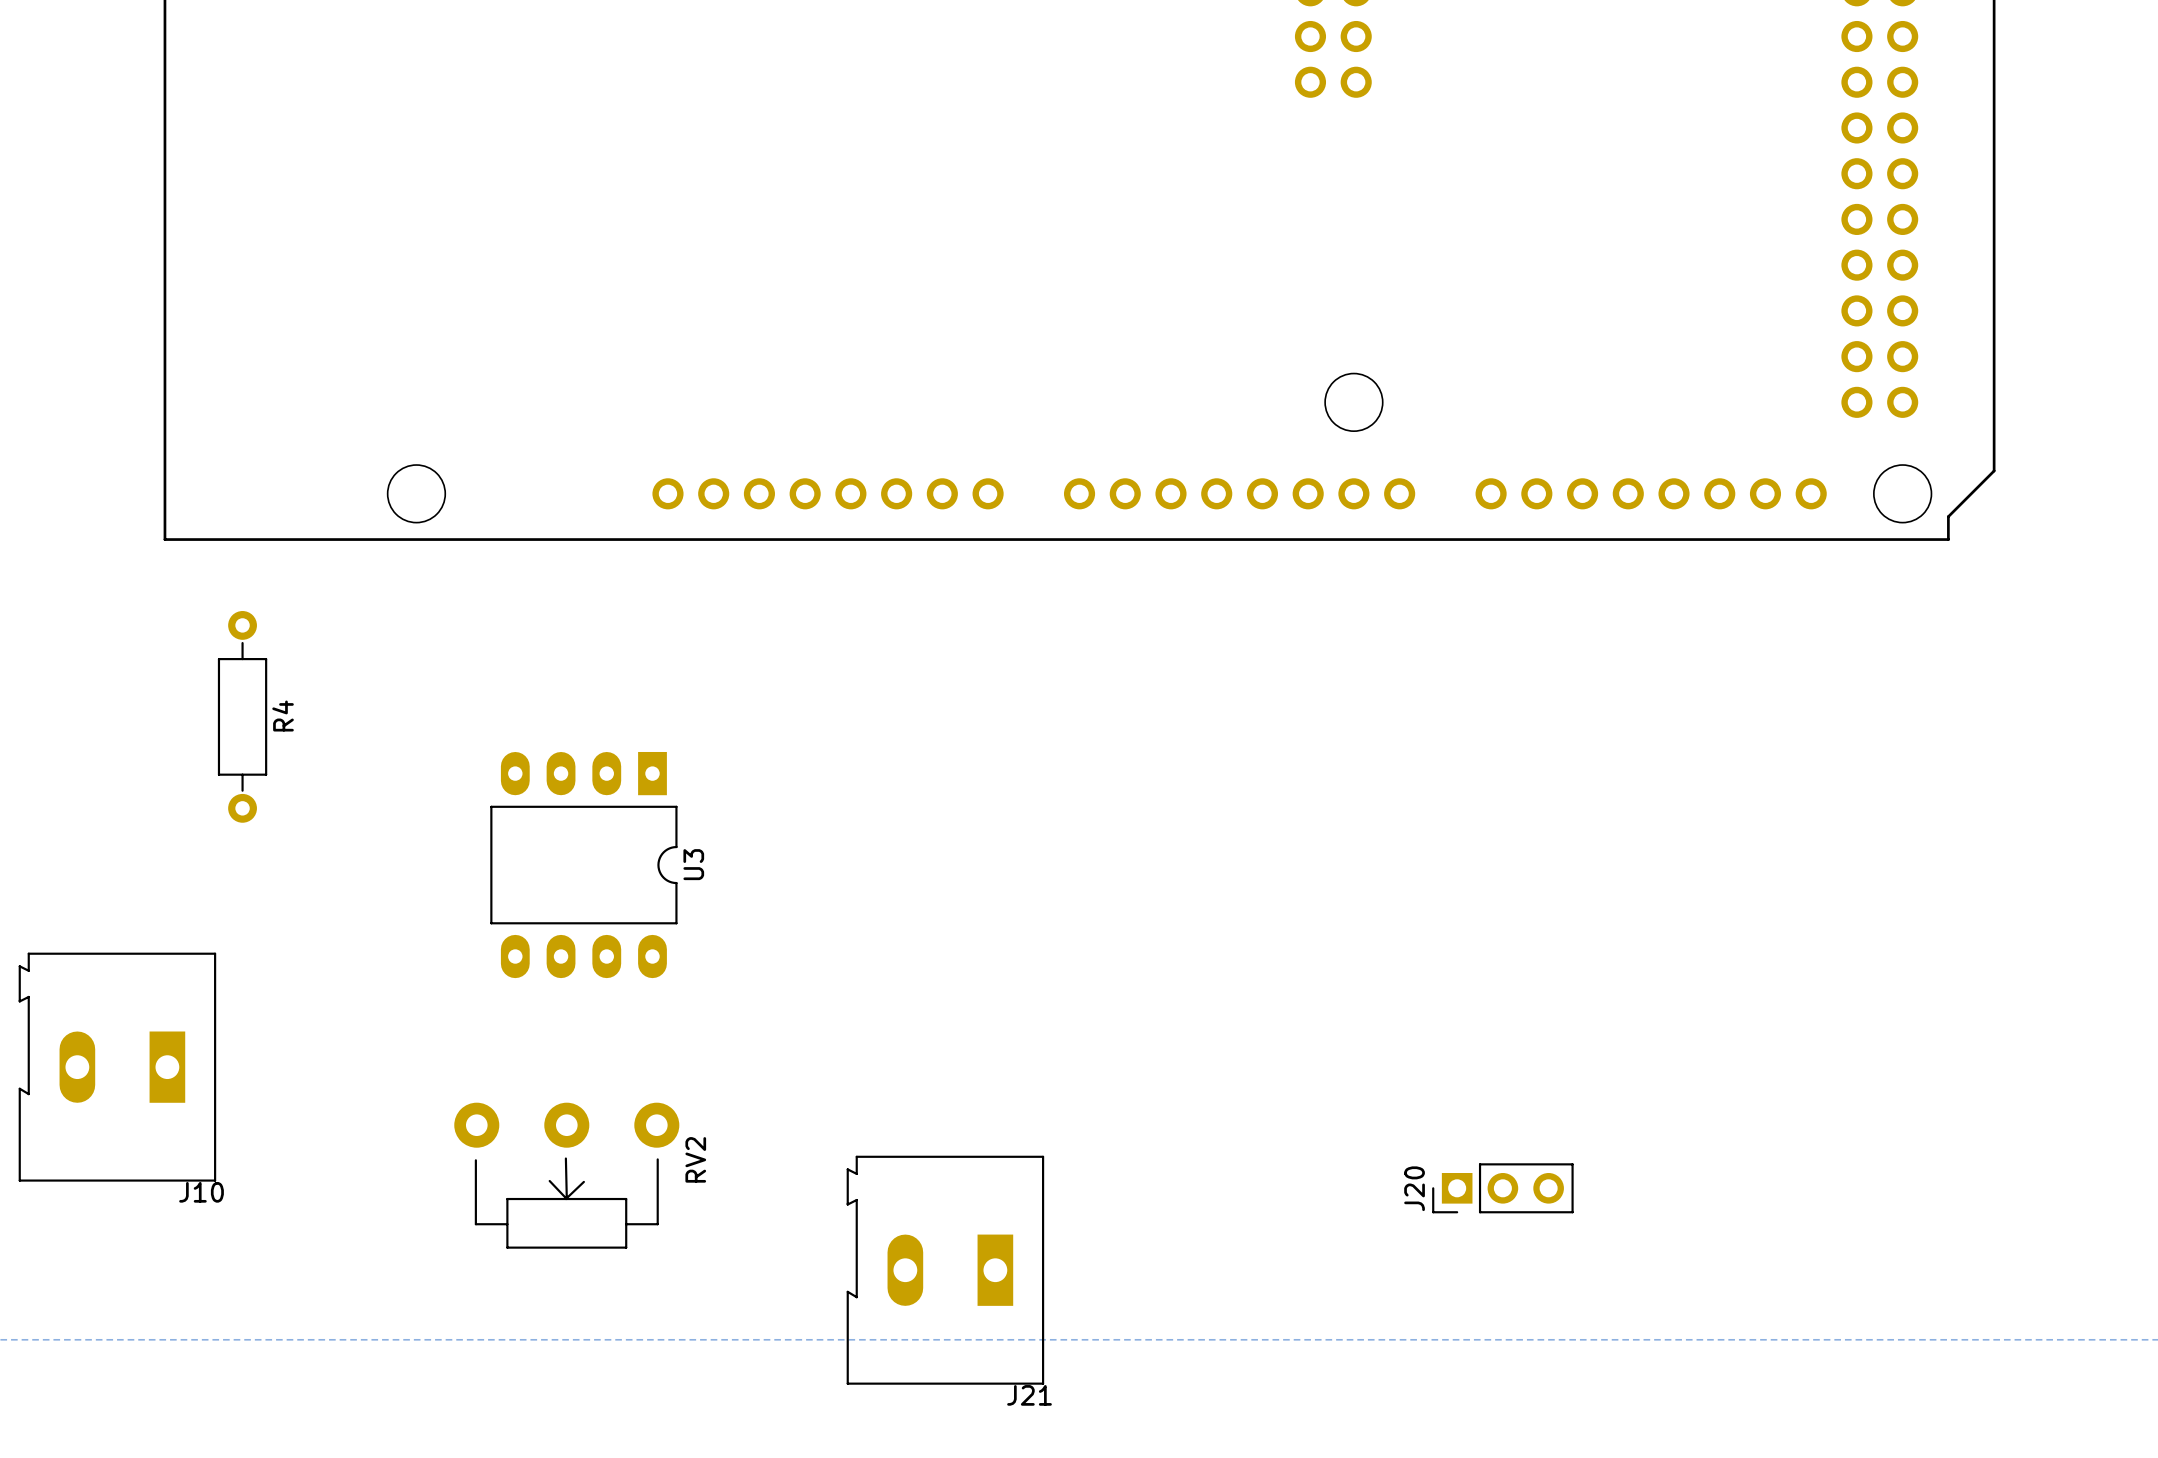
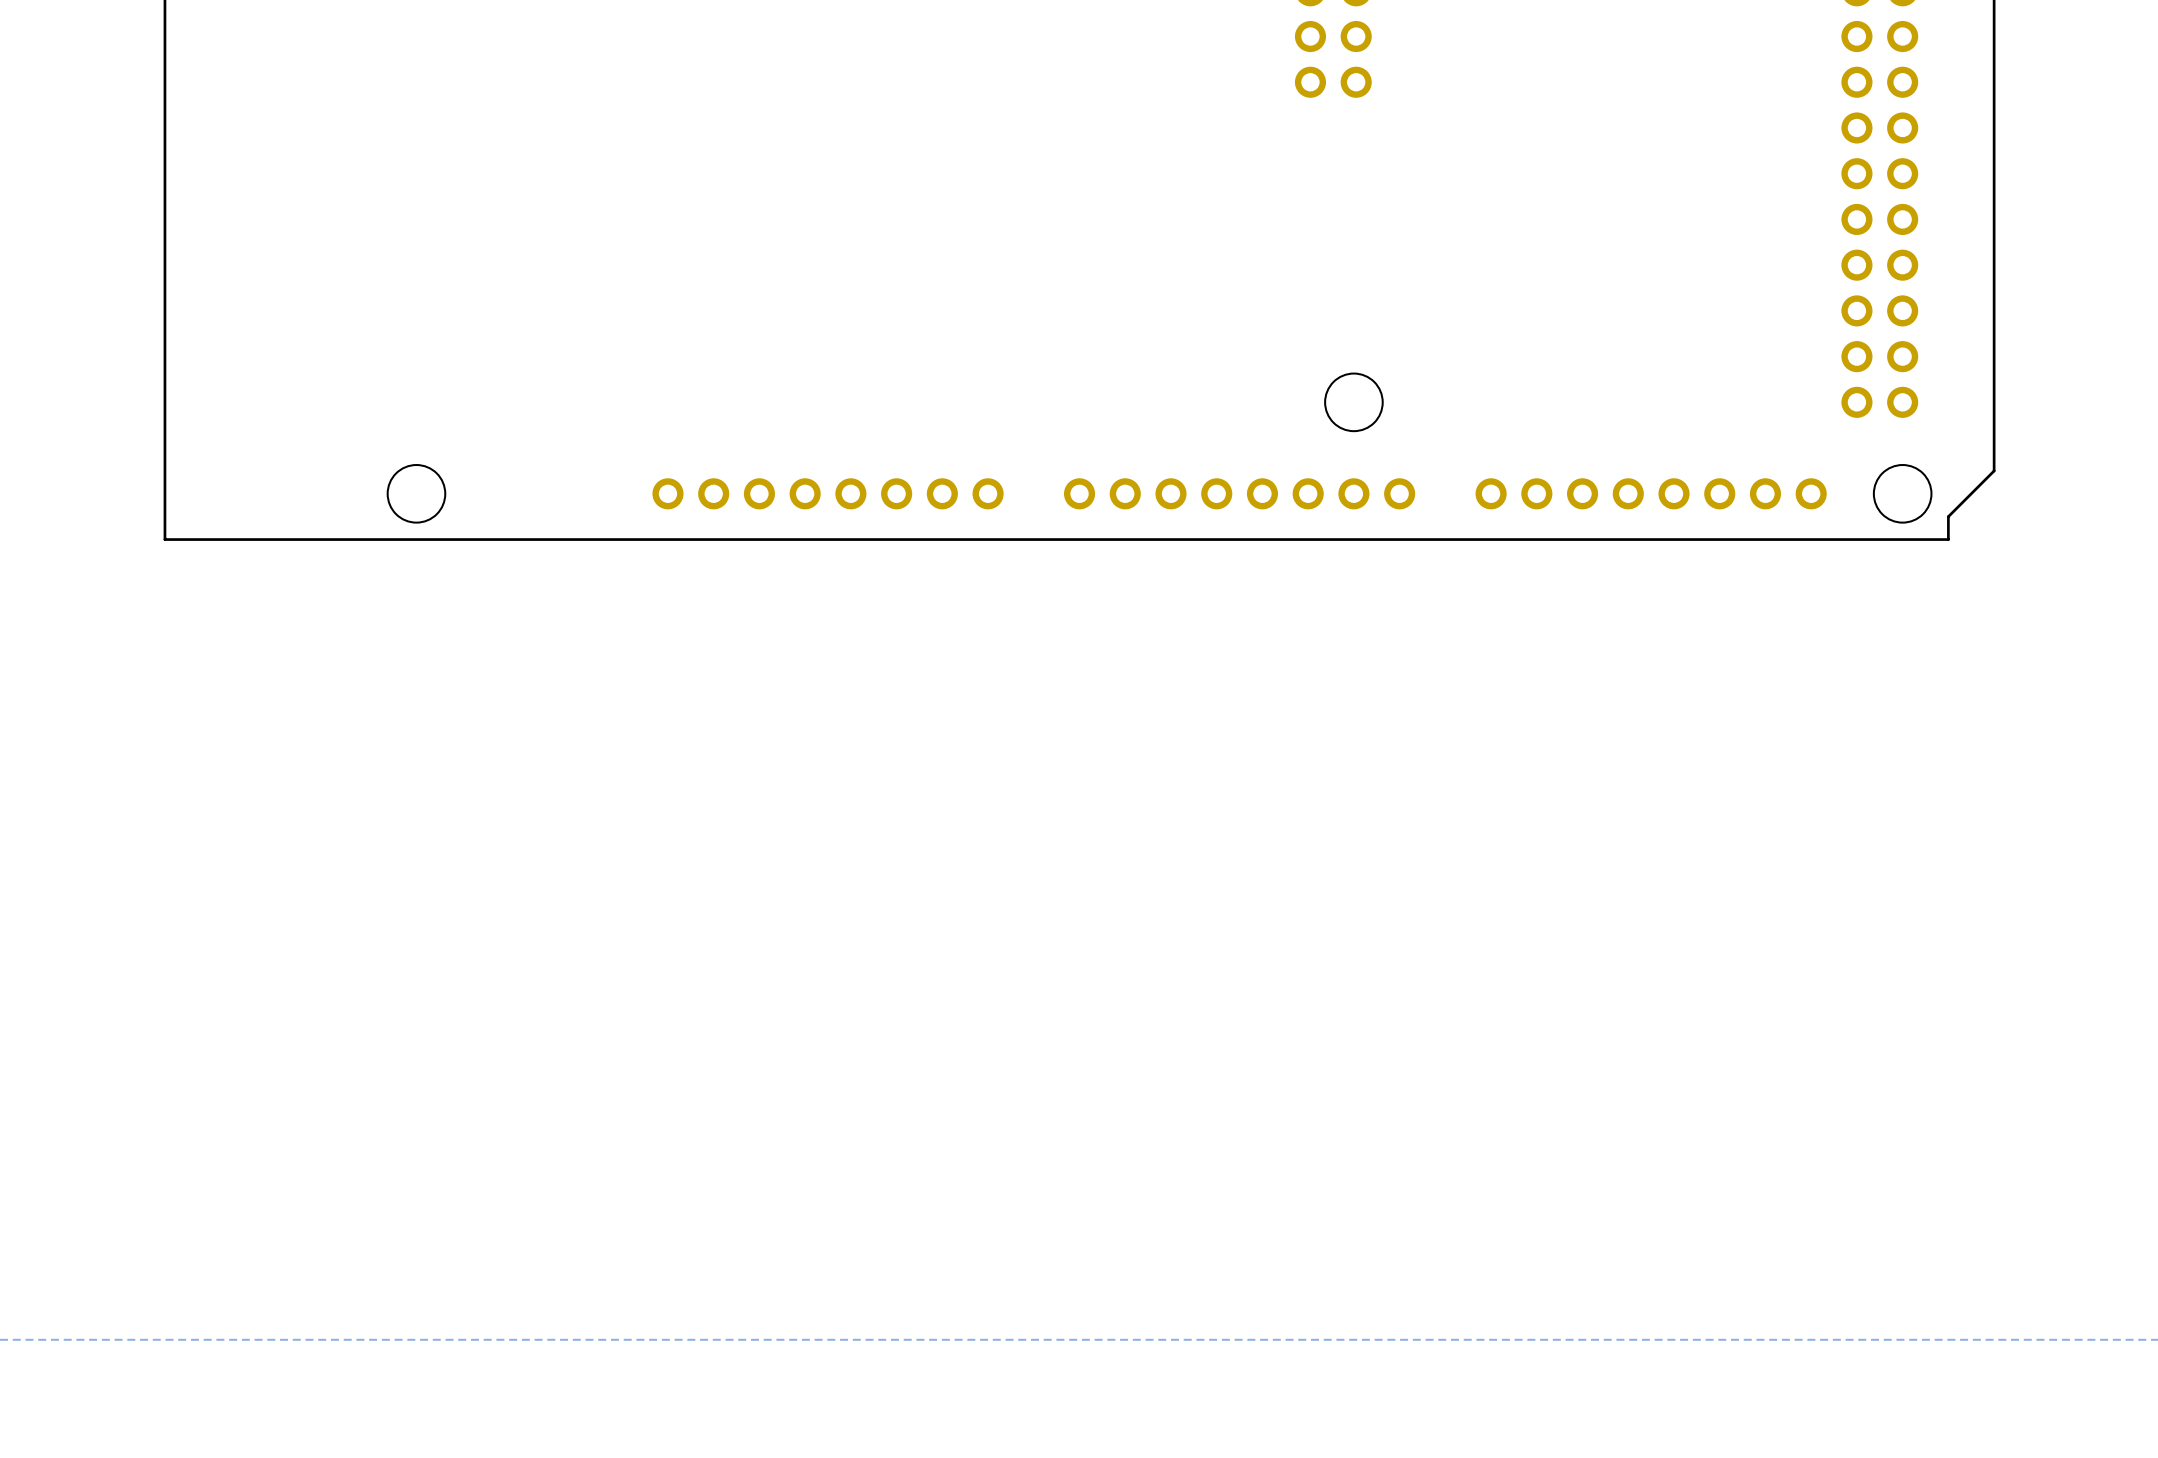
R4: (242, 716) -> none
U3: (583, 865) -> none
J10: (117, 1067) -> none
RV2: (566, 1175) -> none
J20: (1502, 1188) -> none
J21: (945, 1270) -> none

